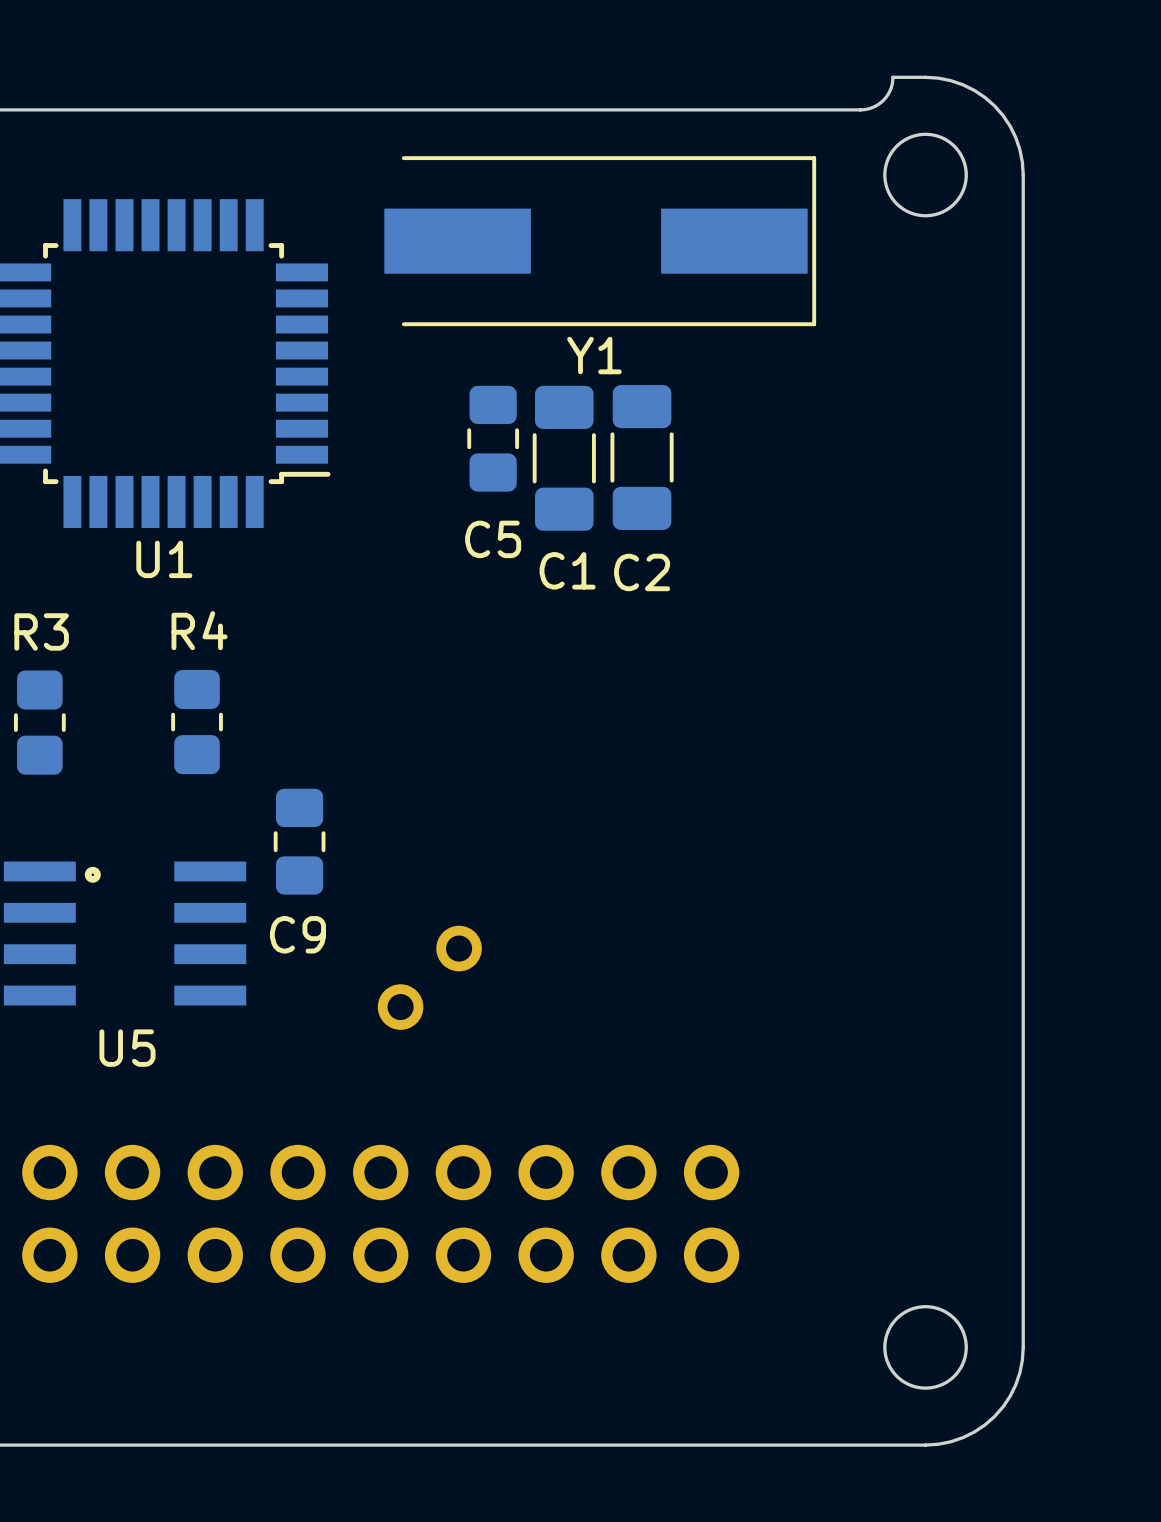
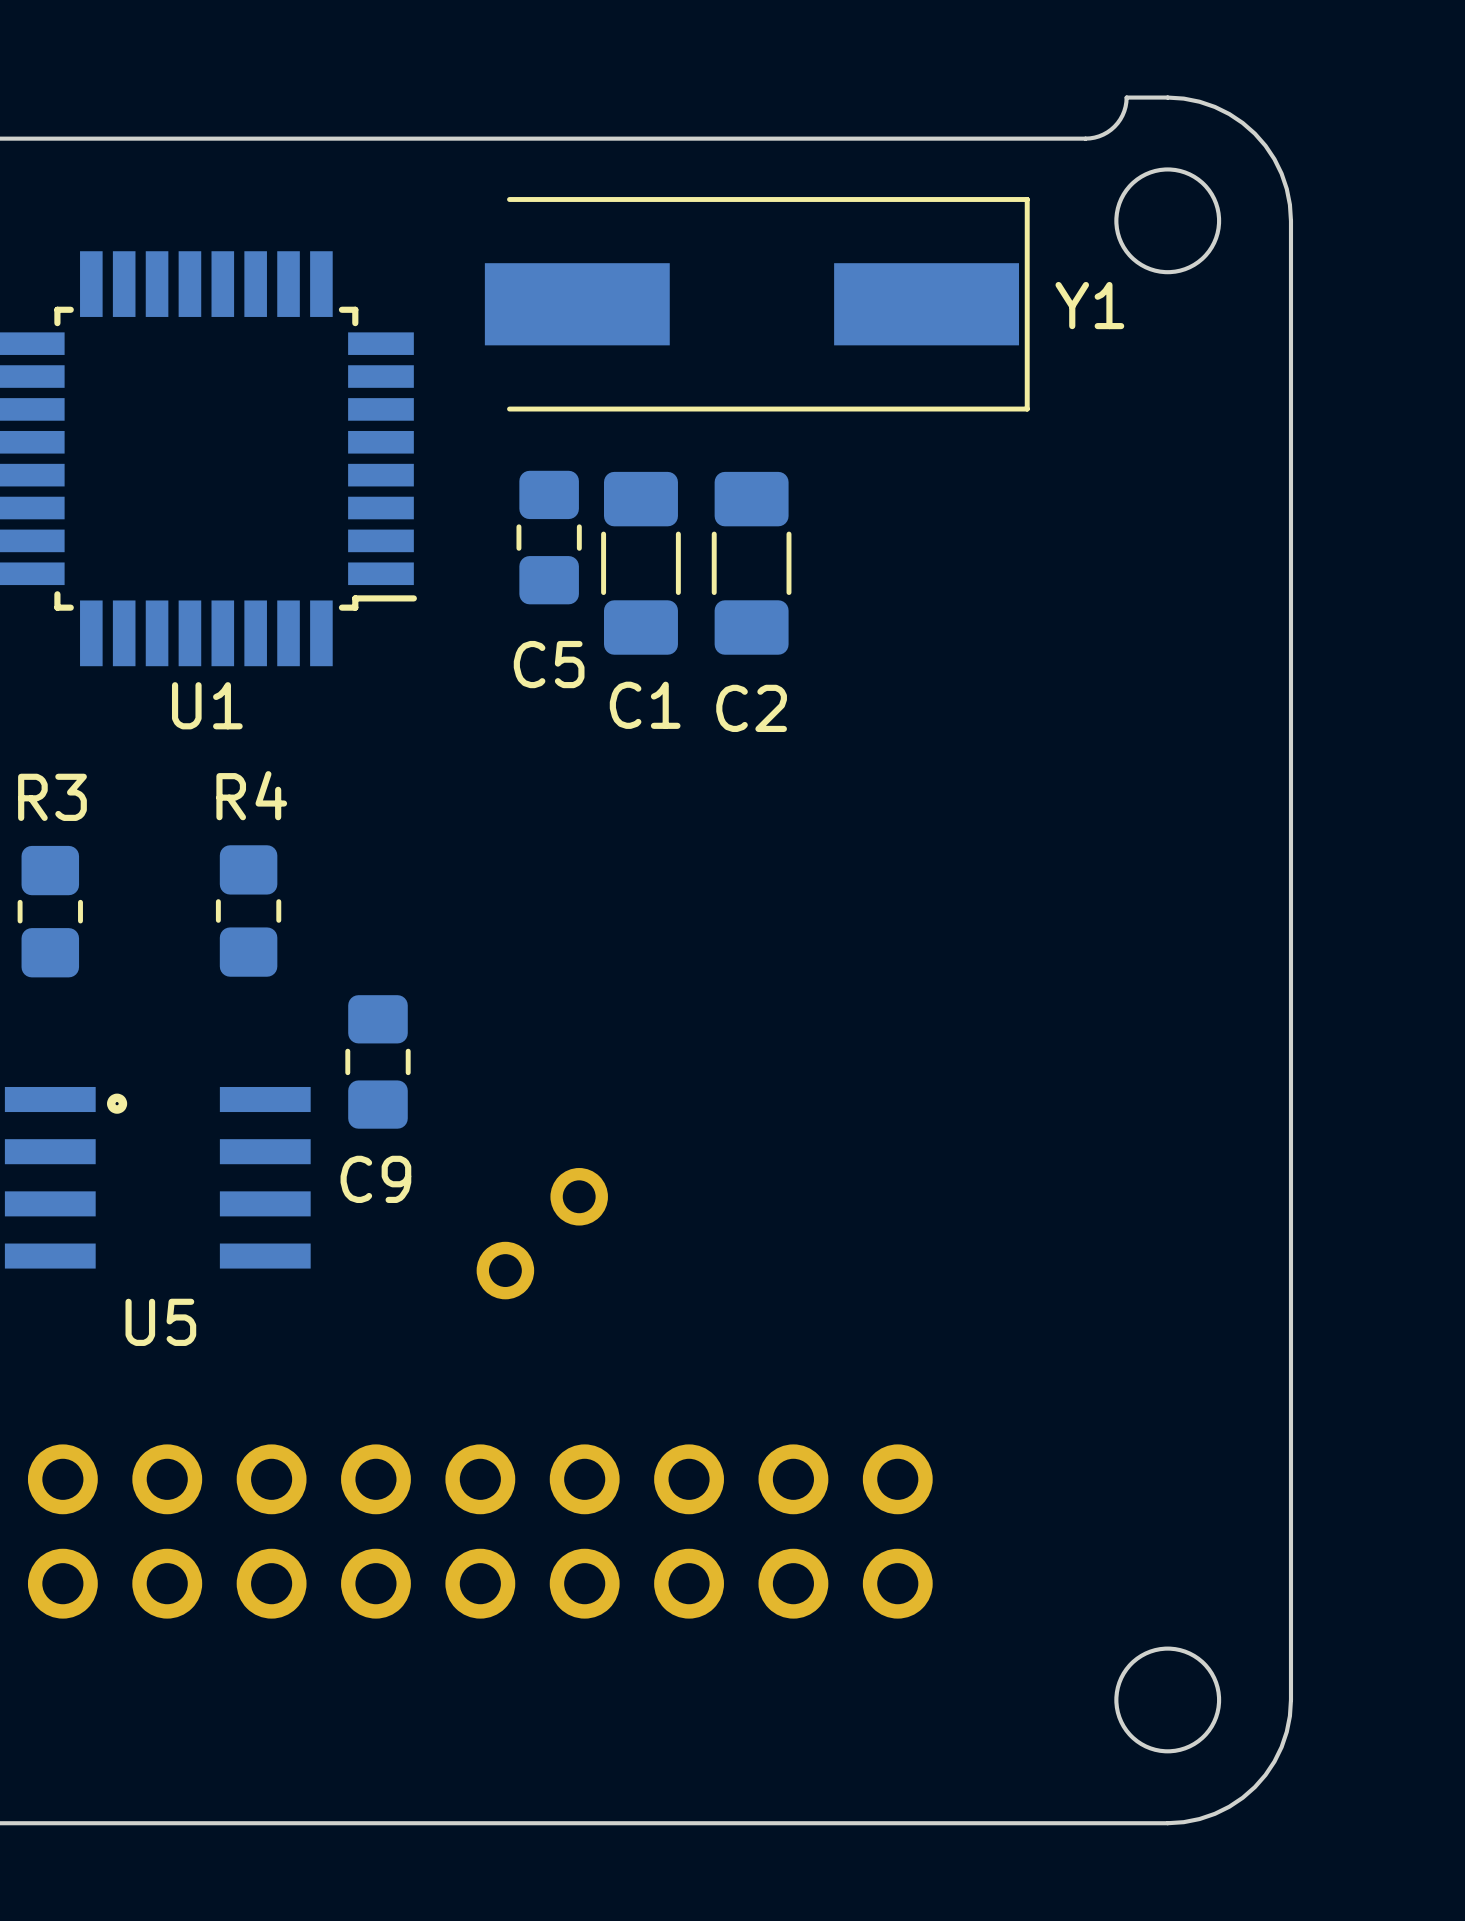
Y1 name position: Y1 (594, 355) -> Y1 (1089, 305)
C5 position: (493, 438) -> (549, 537)
C2 position: (642, 457) -> (751, 563)
C1 position: (564, 458) -> (640, 563)

